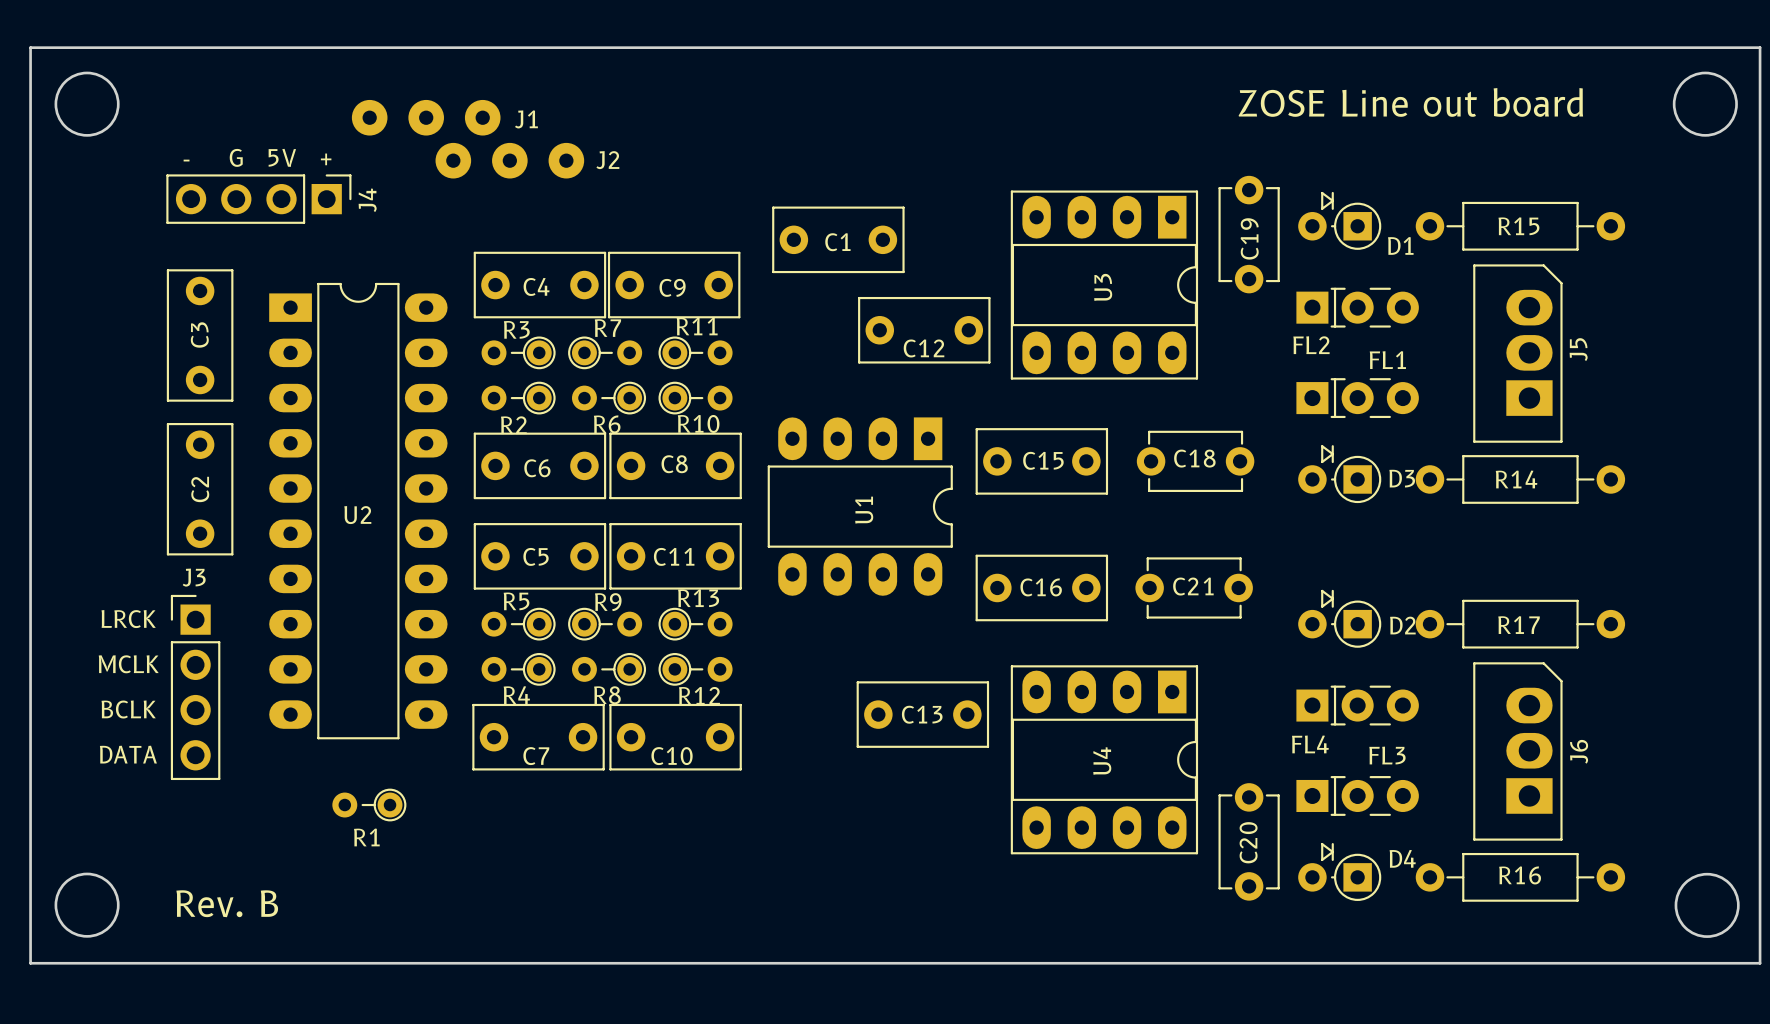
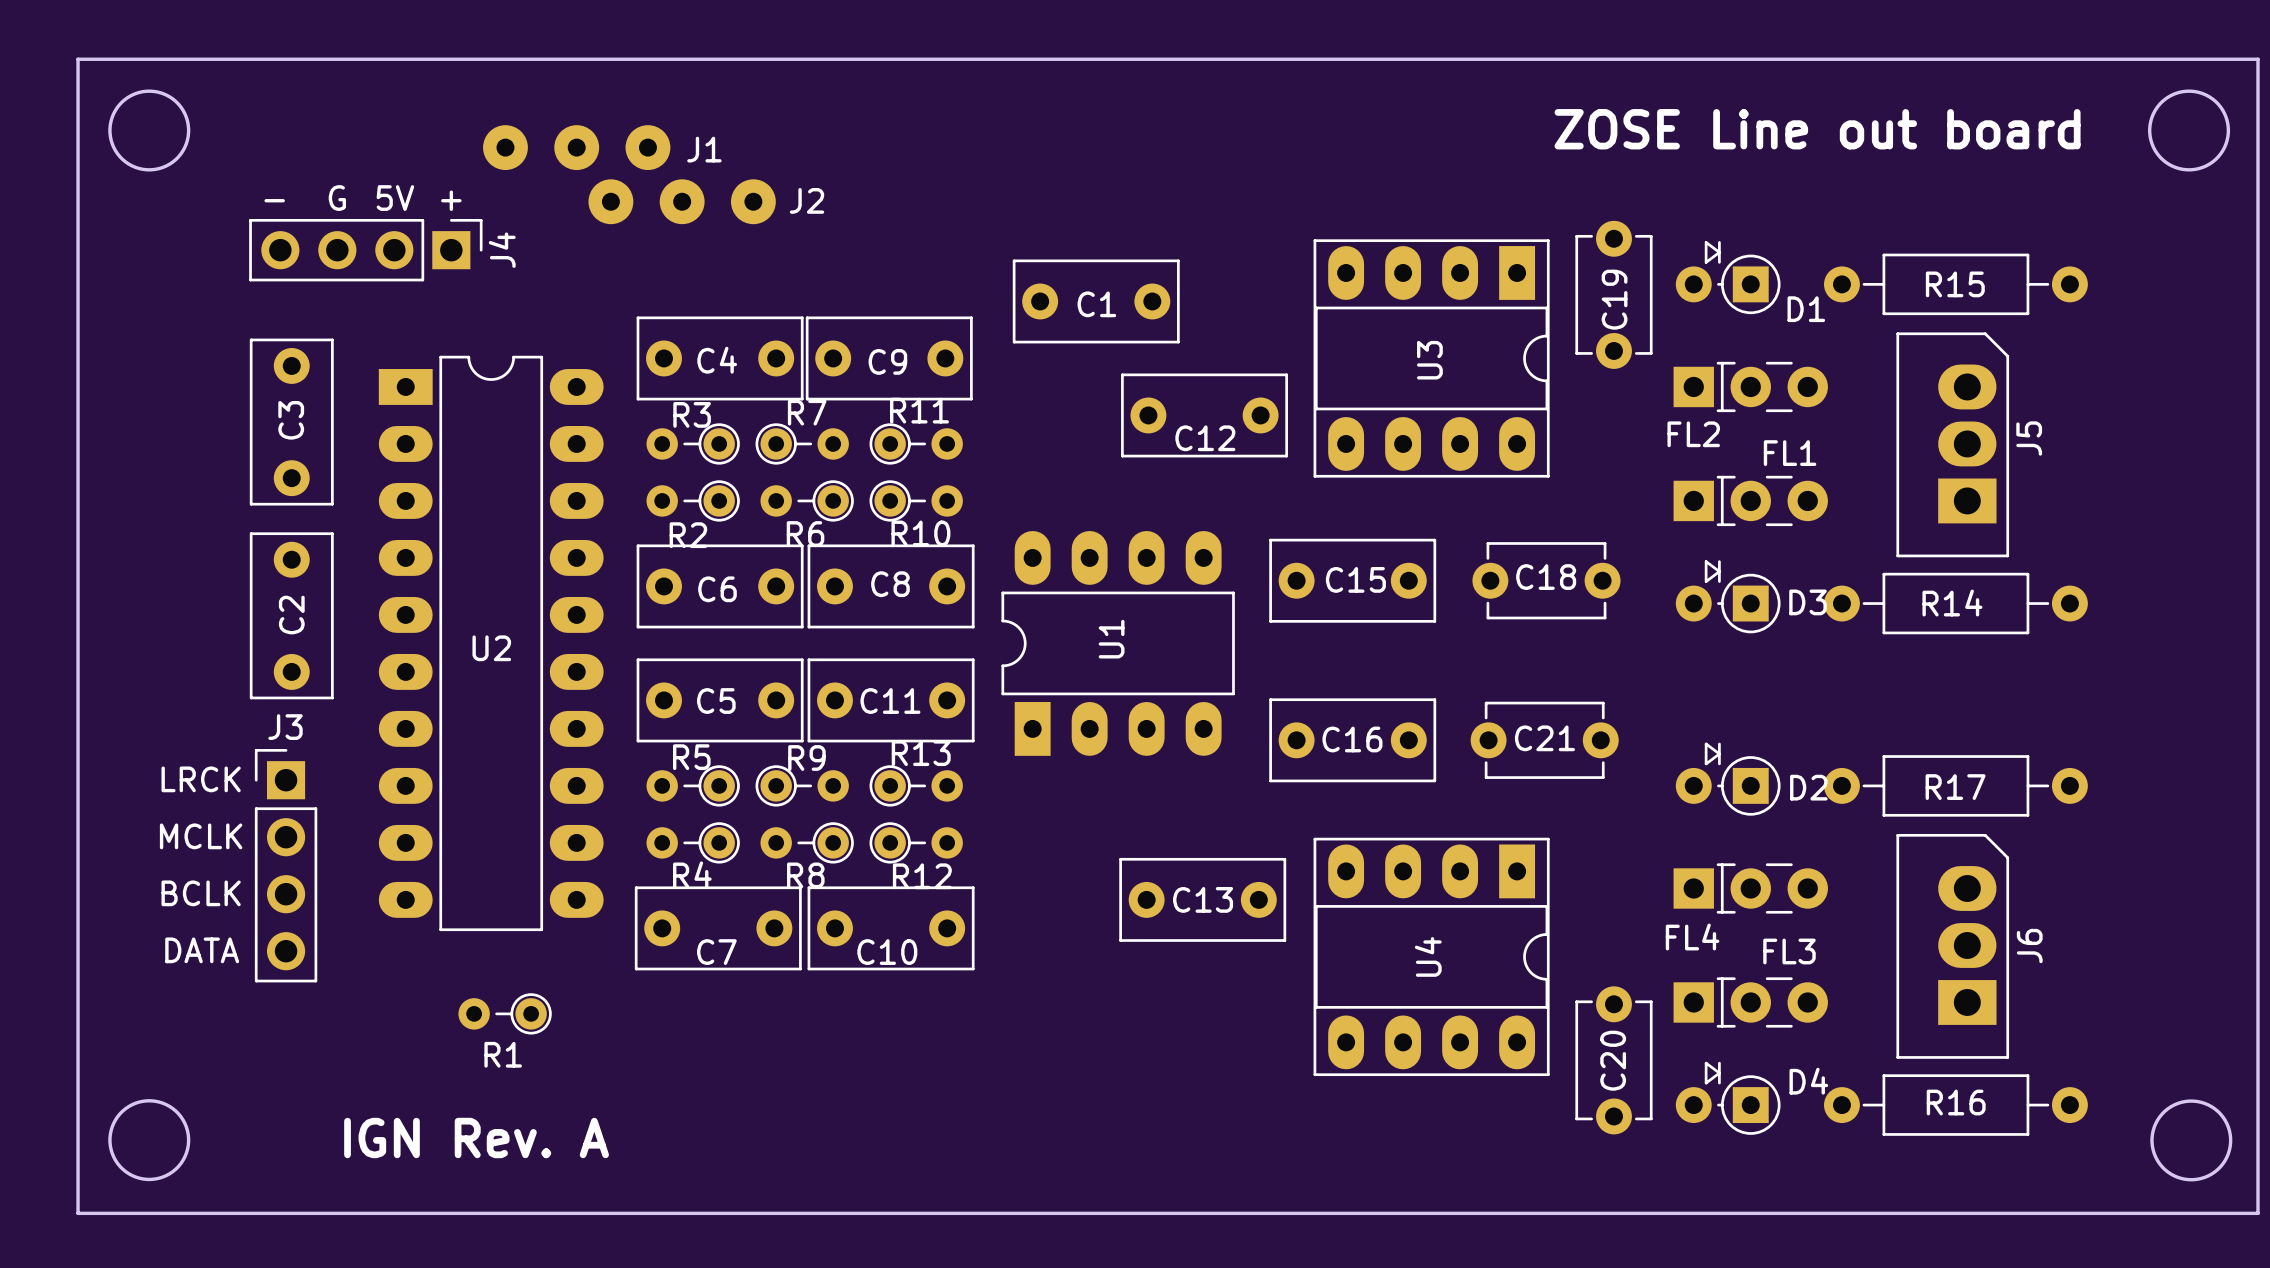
U1 rotation: 0° (860, 506) -> 180° (1118, 643)
text: Rev. B (227, 903) -> IGN Rev. A (476, 1138)

